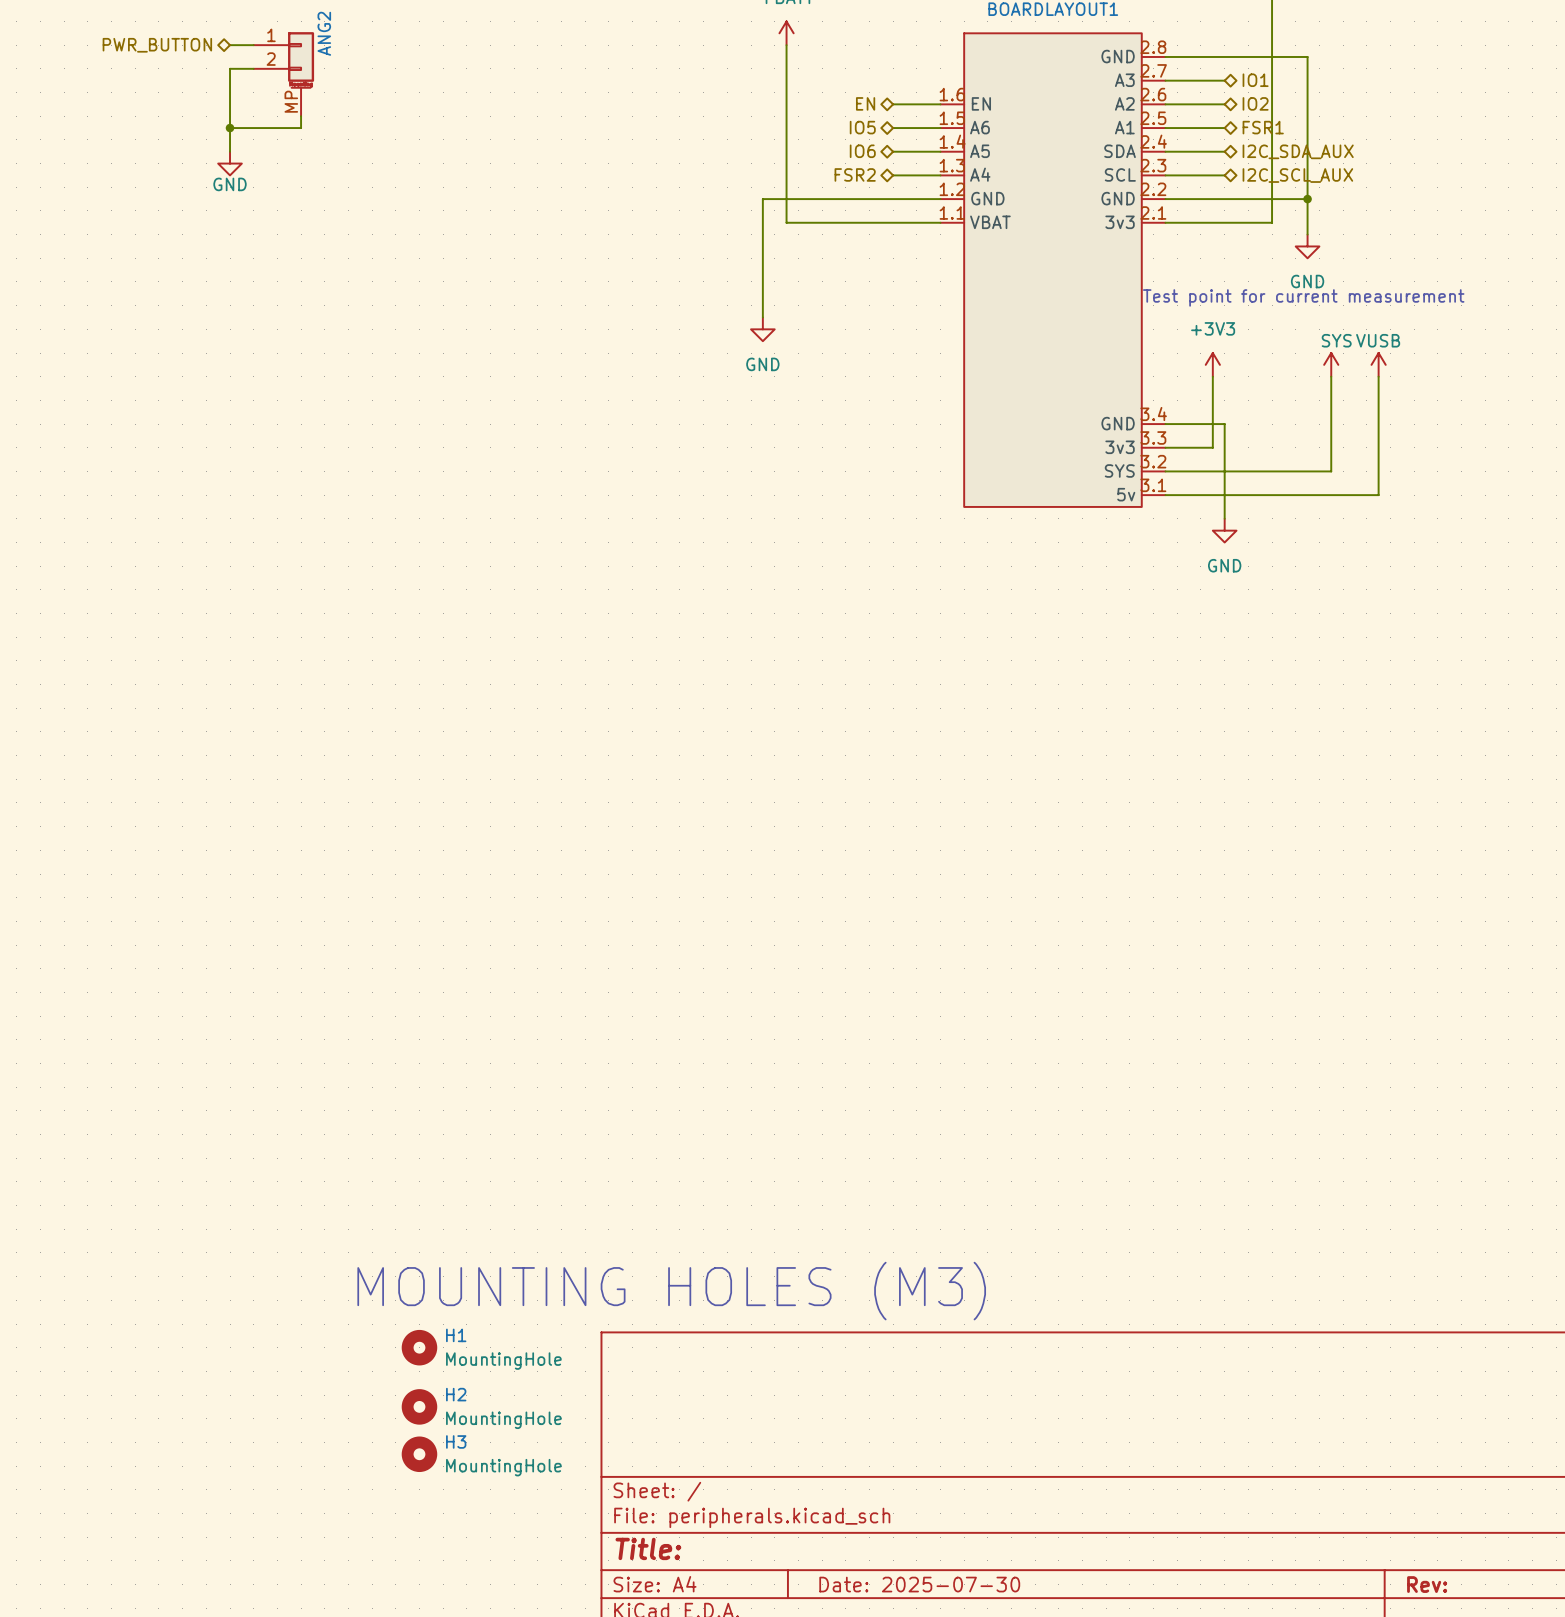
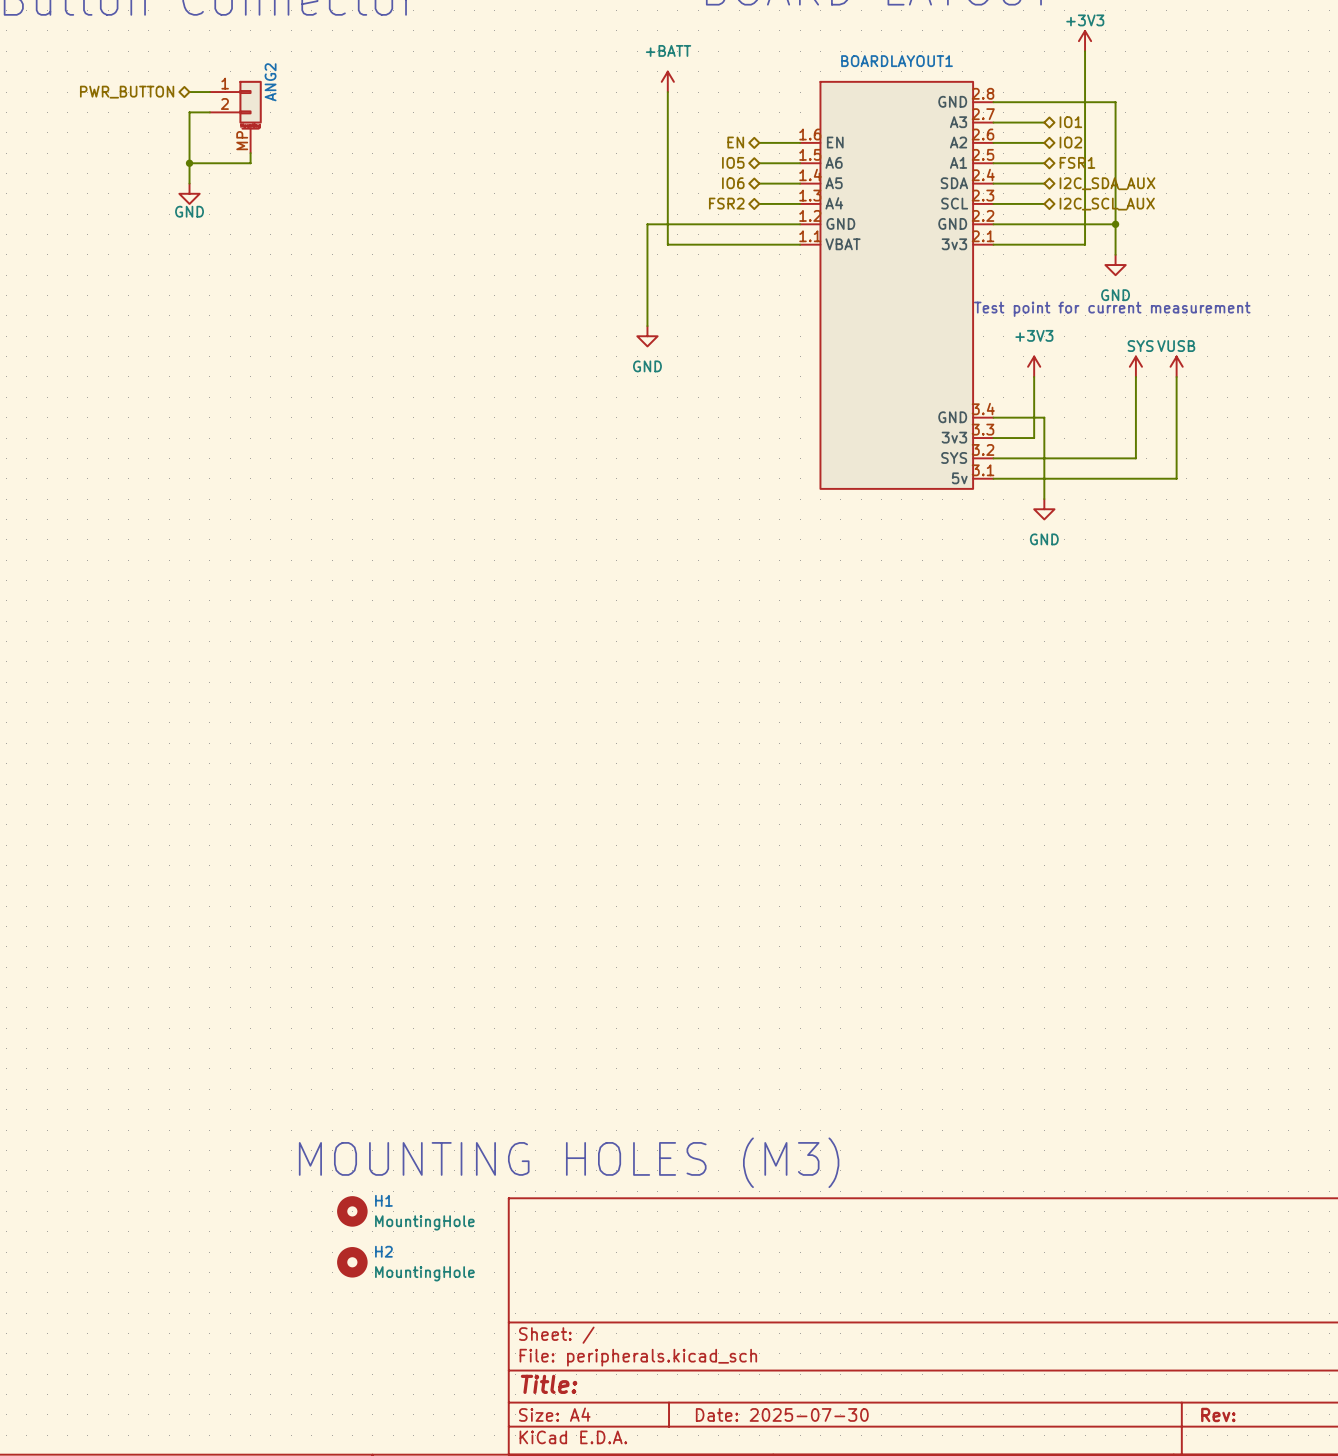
H3: MountingHole (419, 1454) -> none

